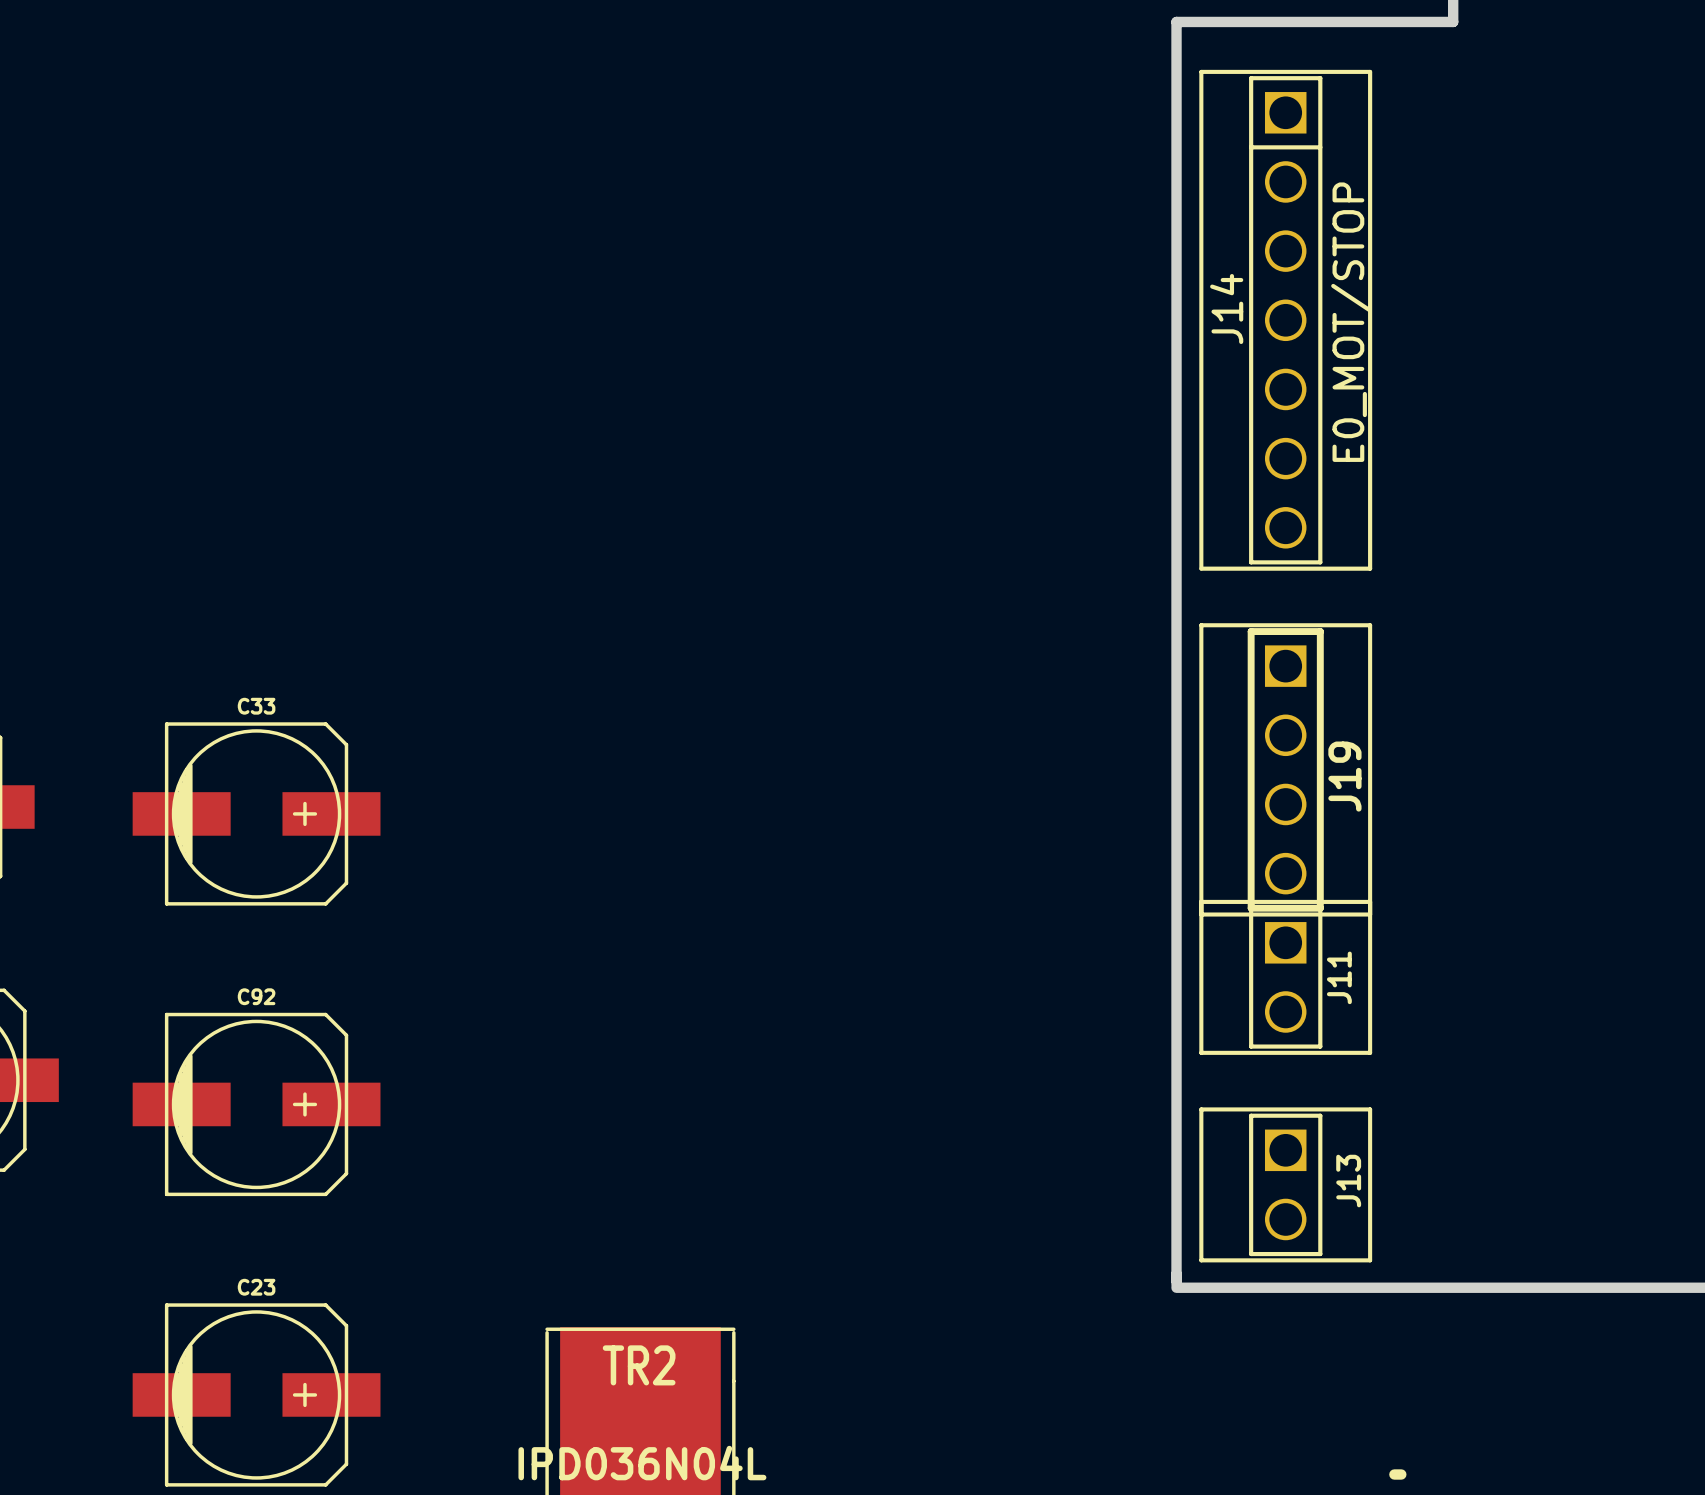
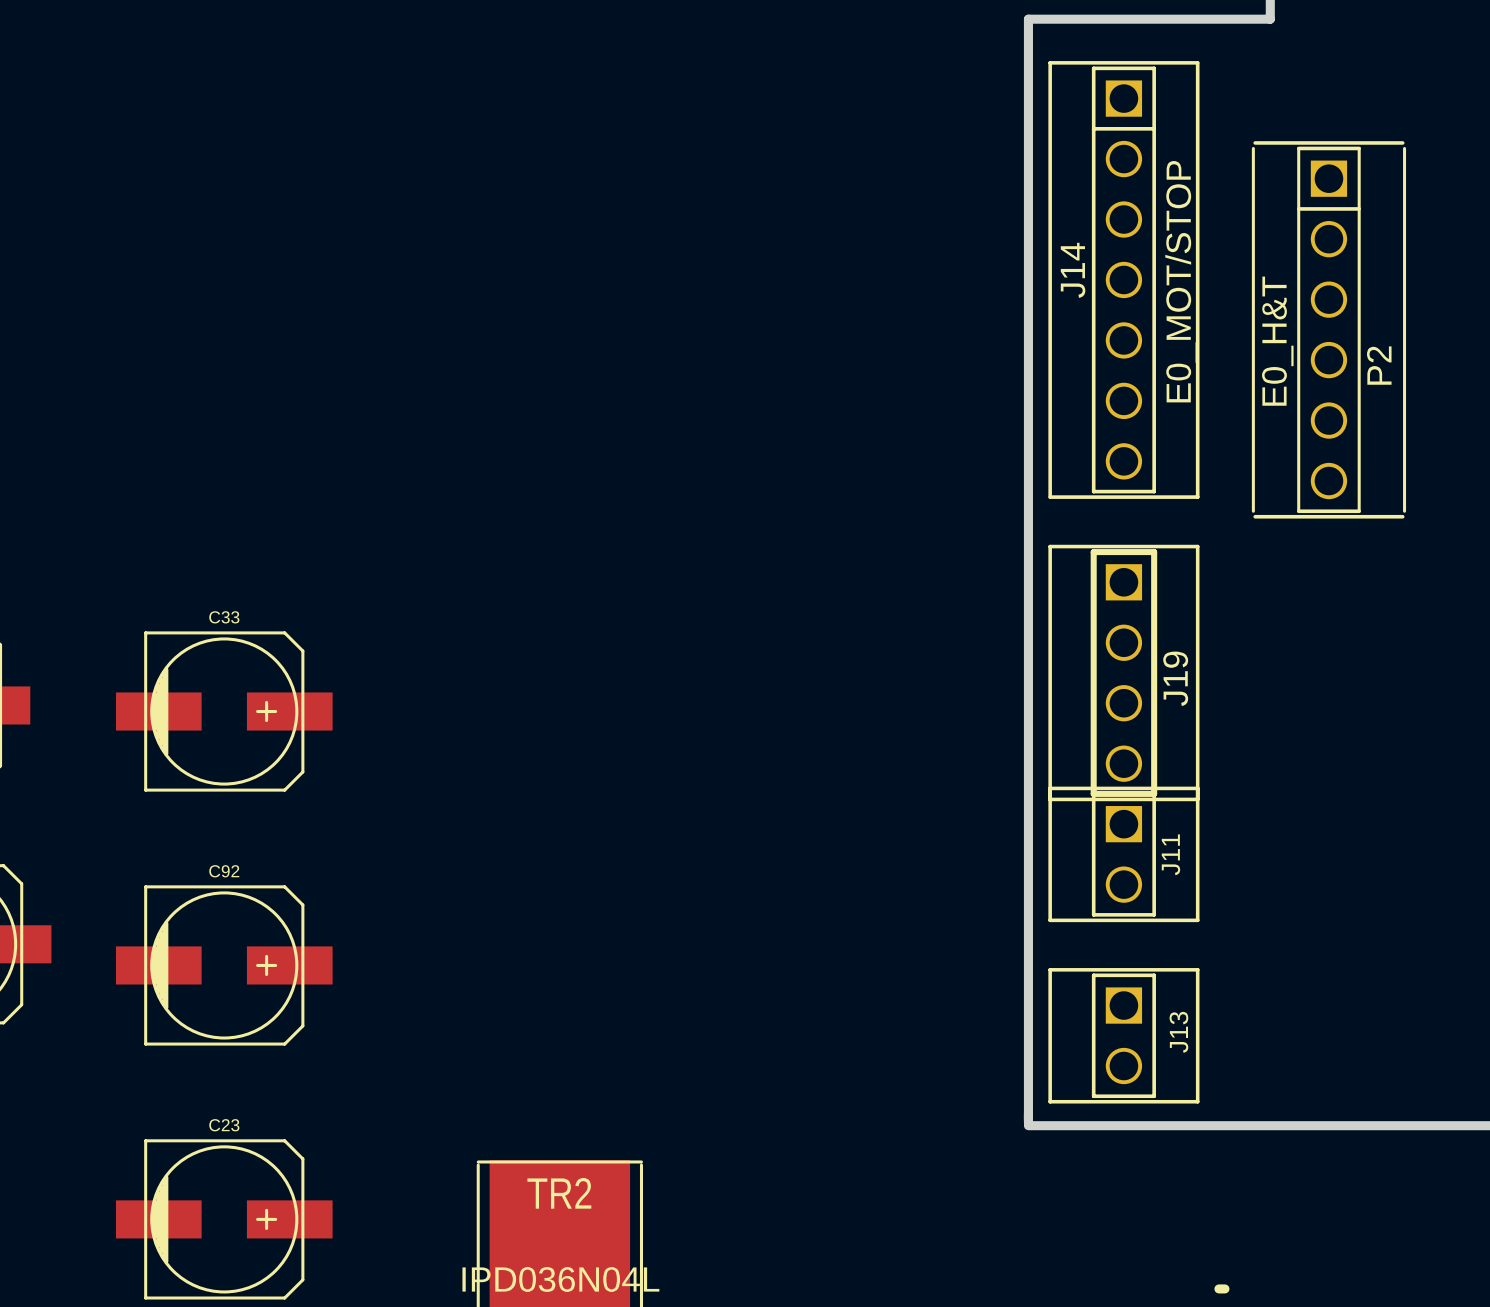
P2: none -> E0_H&T (1328, 329)

